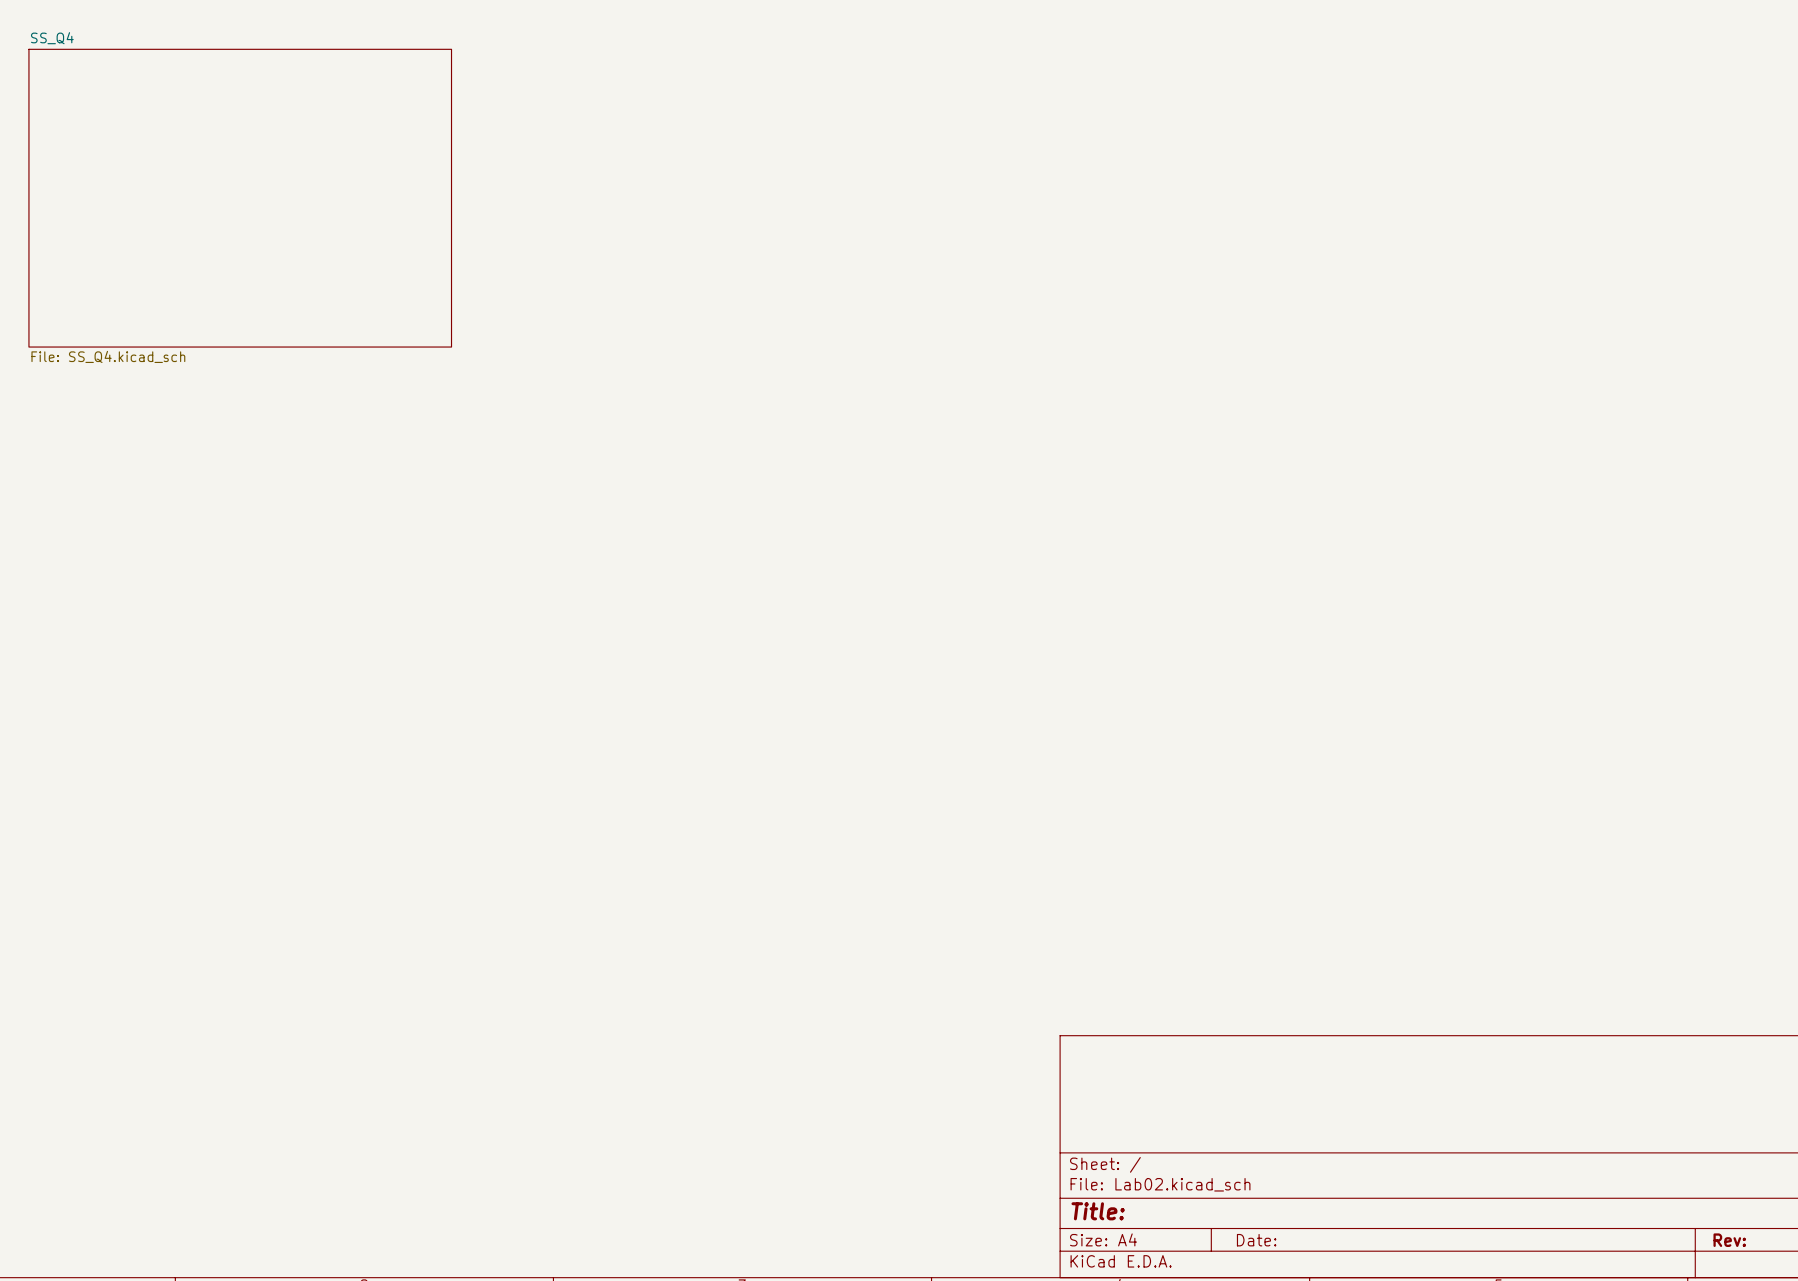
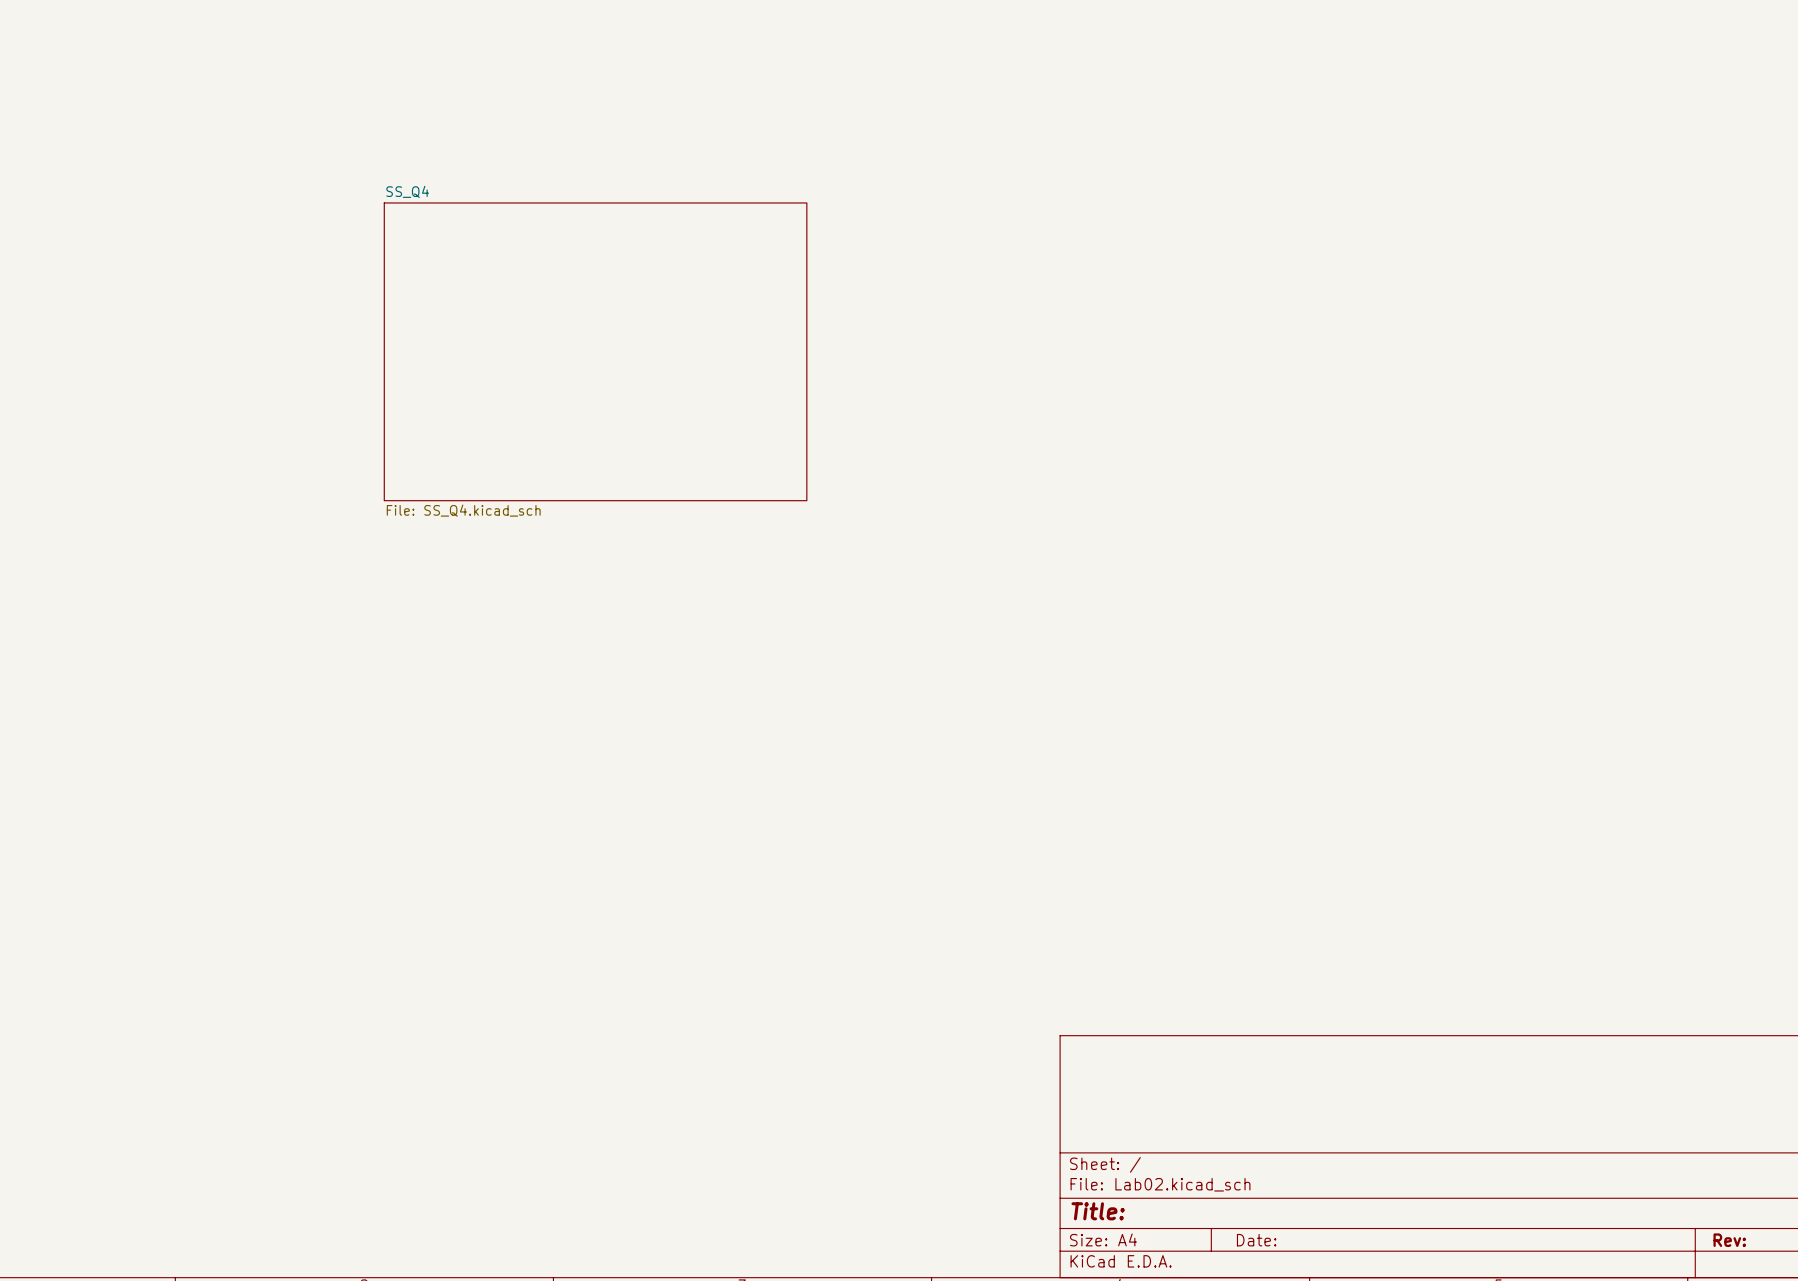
sheet SS_Q4 position: (240, 198) -> (595, 351)

